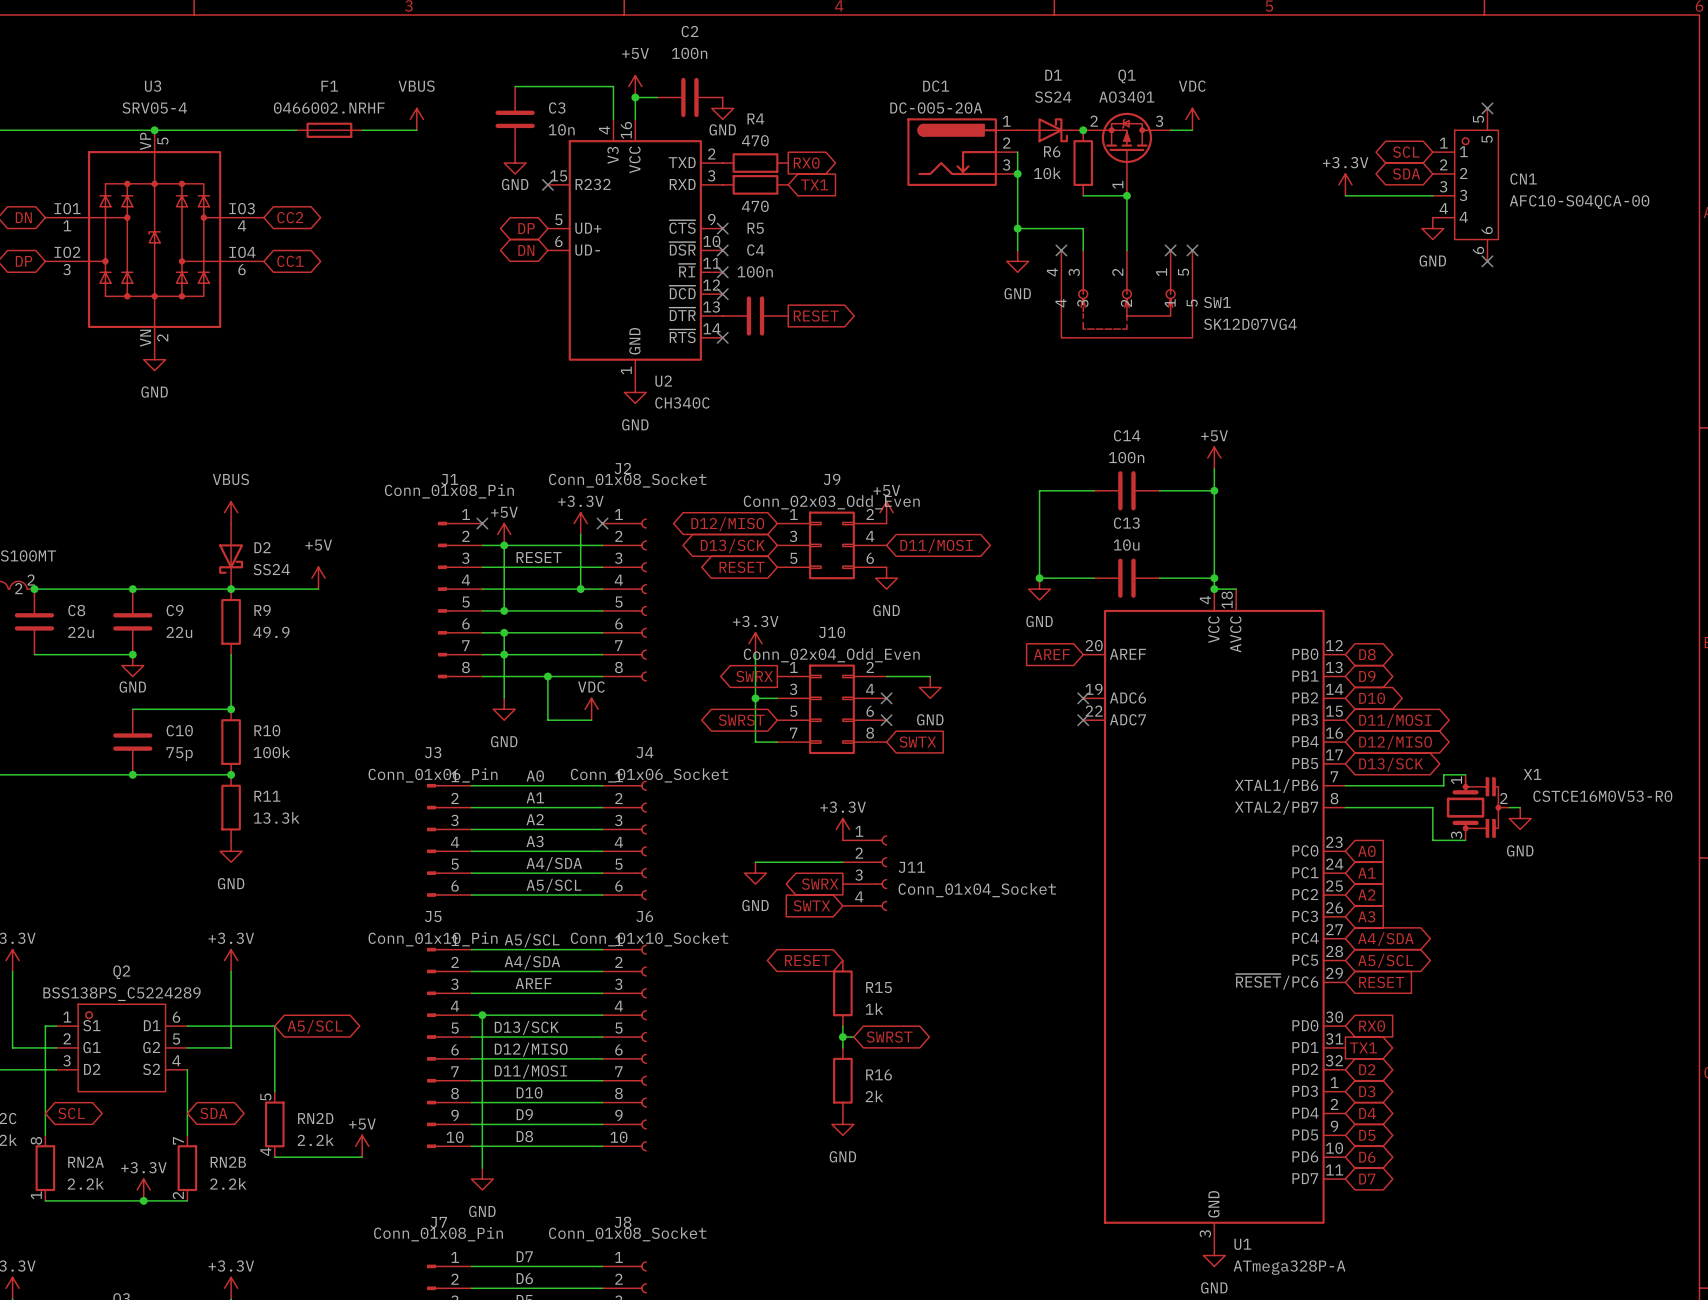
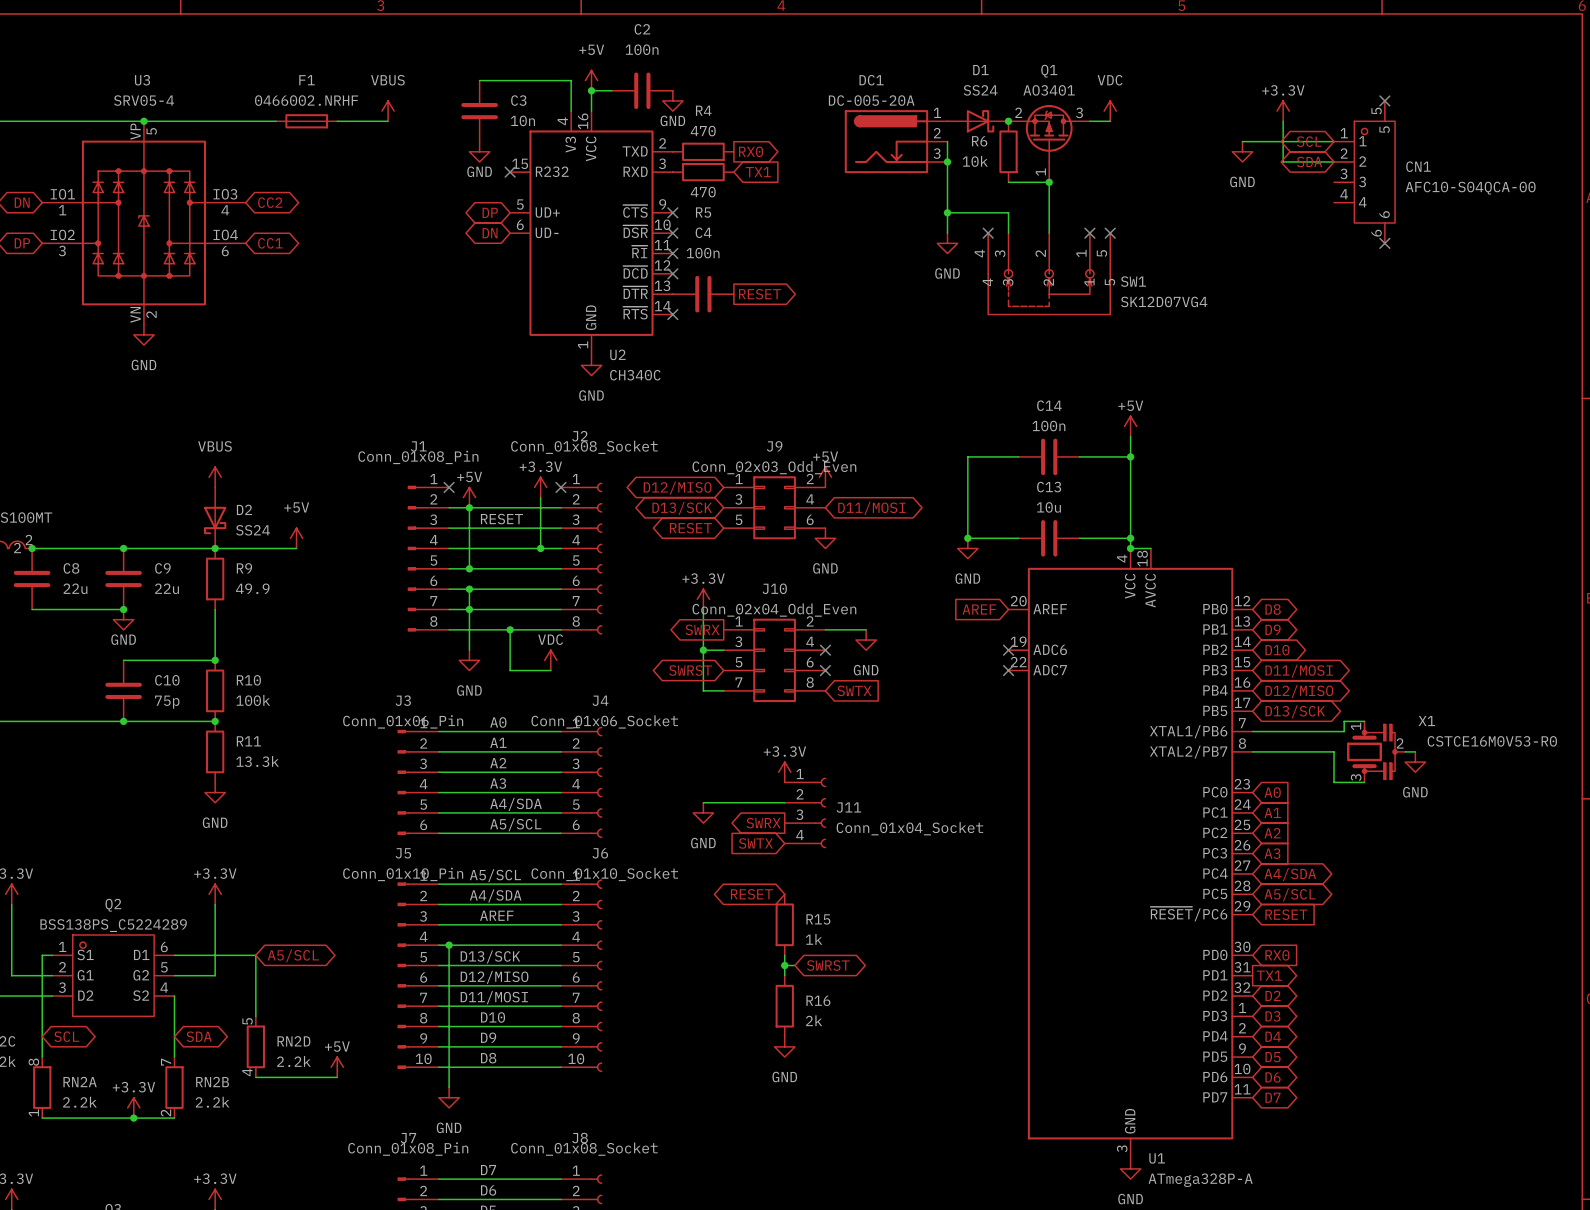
wire: none -> (1283, 121) (1283, 161) (1334, 161)
wire: none -> (1242, 141) (1334, 141)
power symbol position: +3.3V (1345, 184) -> +3.3V (1283, 111)
wire: (1345, 195) (1432, 195) -> none
power symbol position: GND (1432, 228) -> GND (1242, 151)

